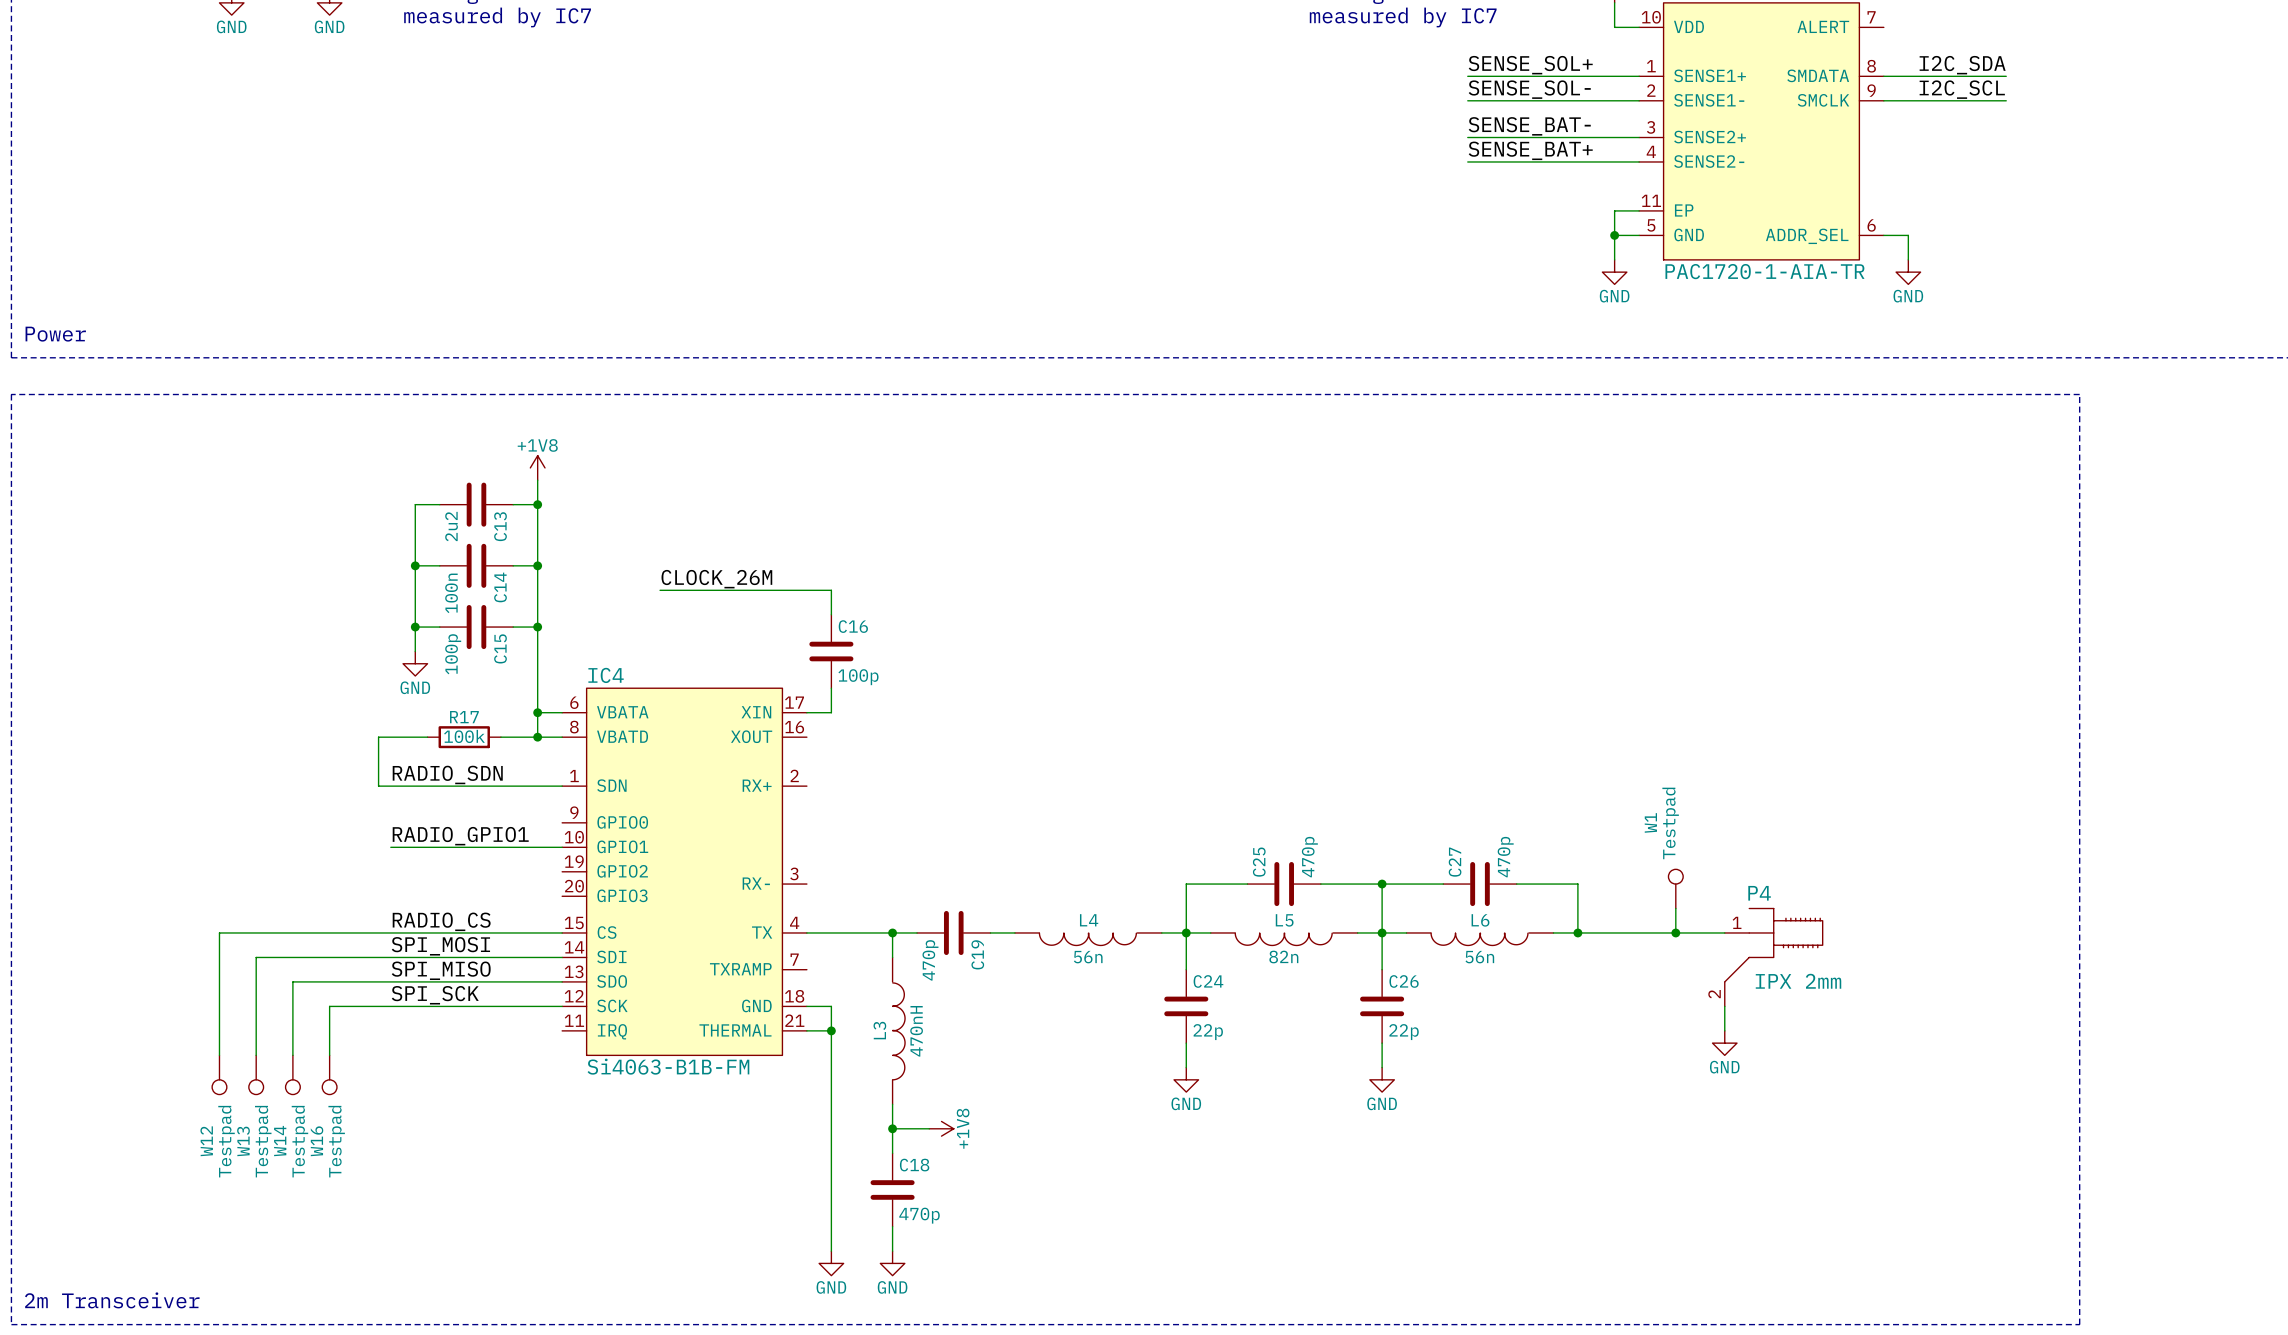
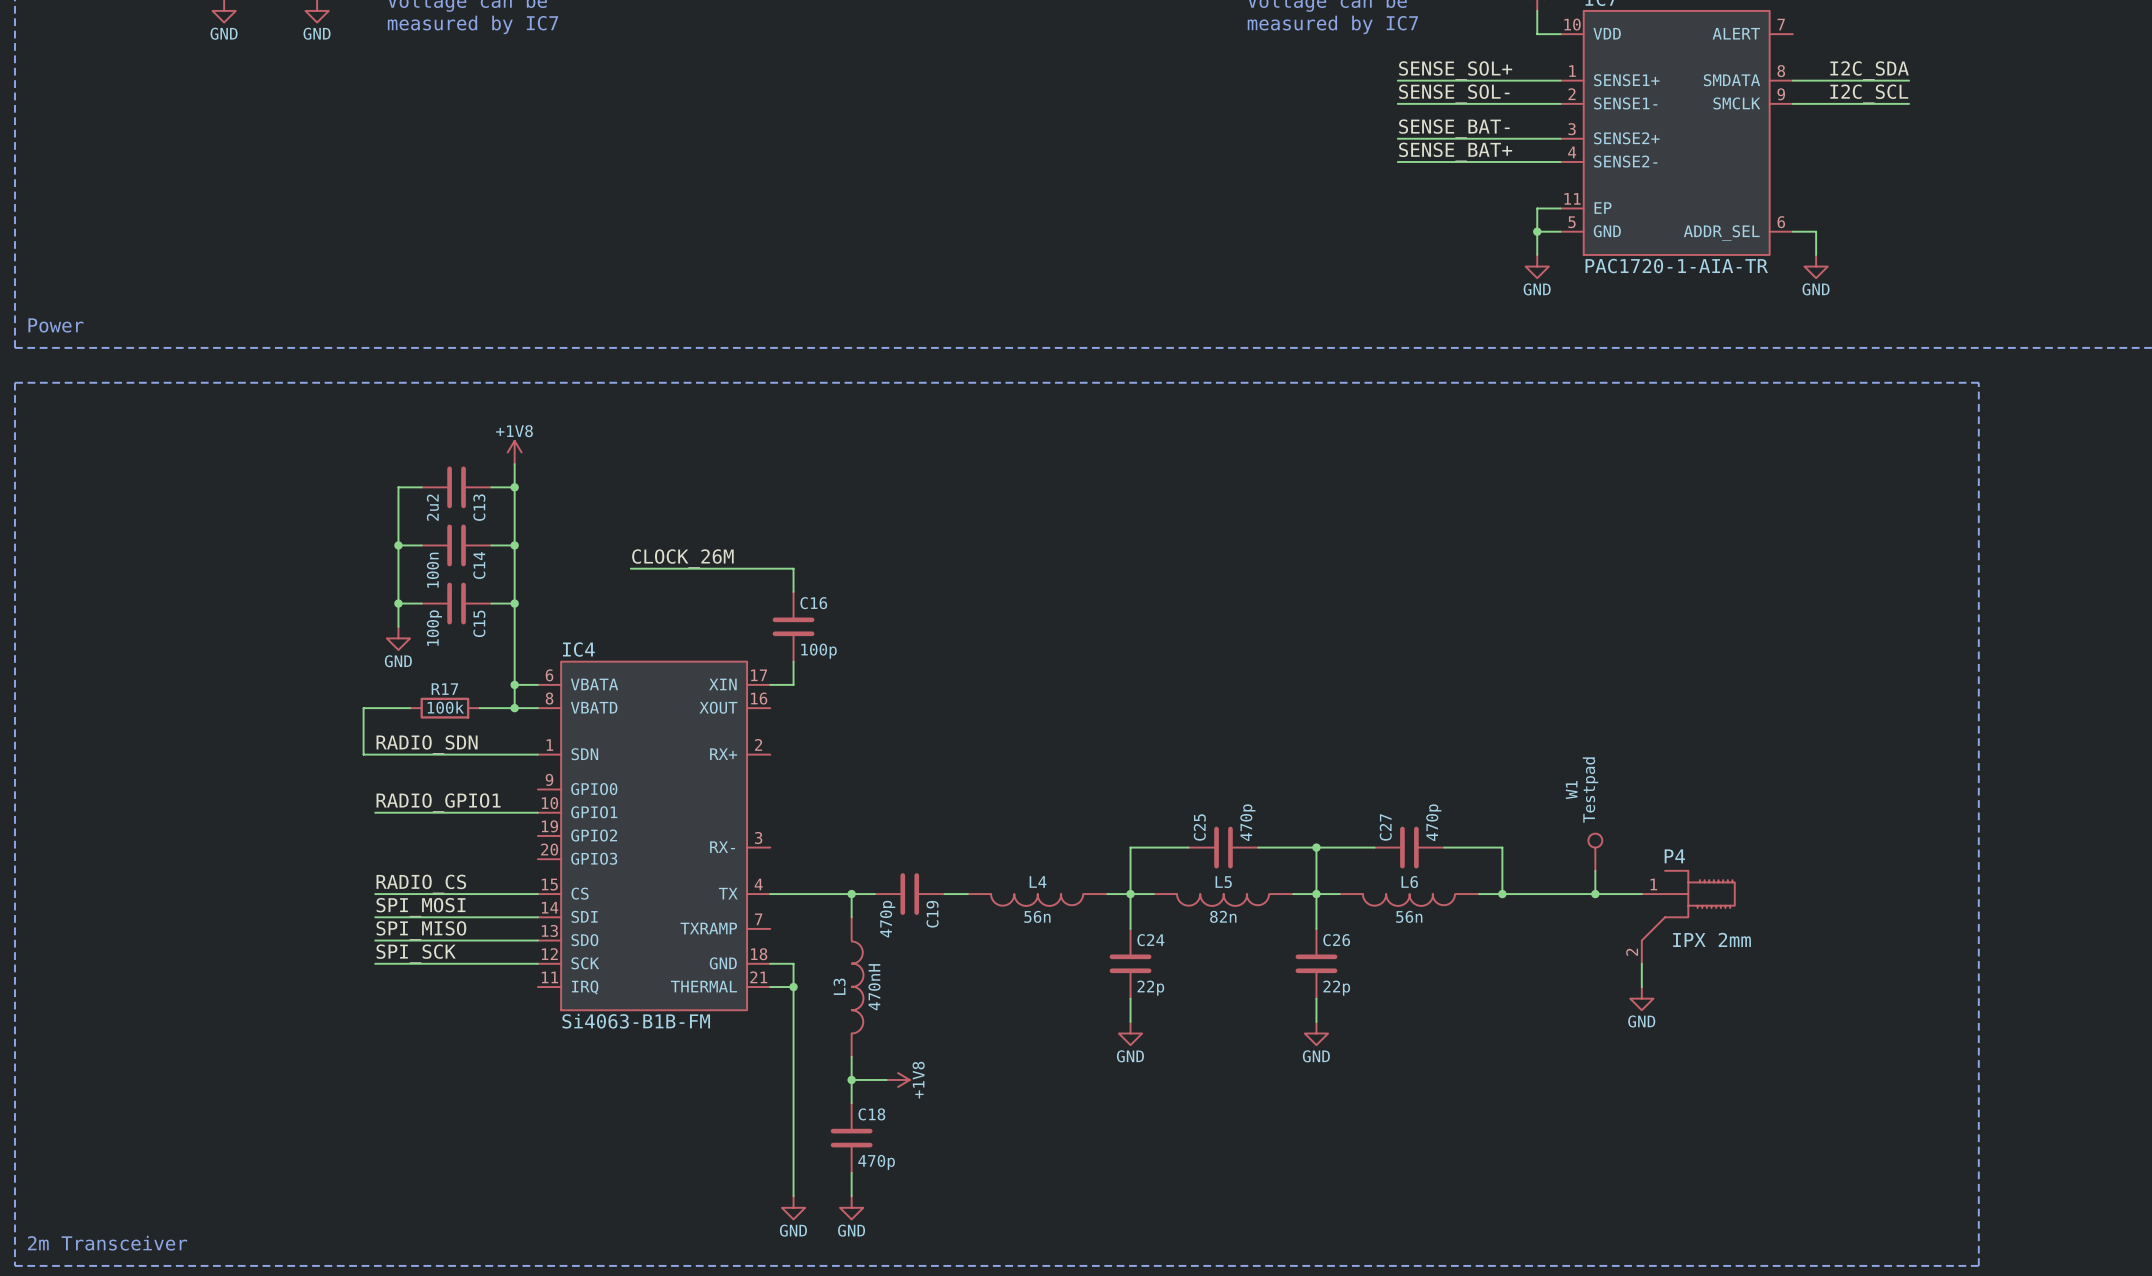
wire: (390, 932) (219, 932) (219, 1055) -> none
wire: (390, 957) (256, 957) (256, 1055) -> none
wire: (390, 981) (292, 981) (292, 1055) -> none
wire: (390, 1006) (329, 1006) (329, 1055) -> none
W12: Testpad (219, 1074) -> none
W13: Testpad (256, 1074) -> none
W14: Testpad (292, 1074) -> none
W16: Testpad (329, 1074) -> none

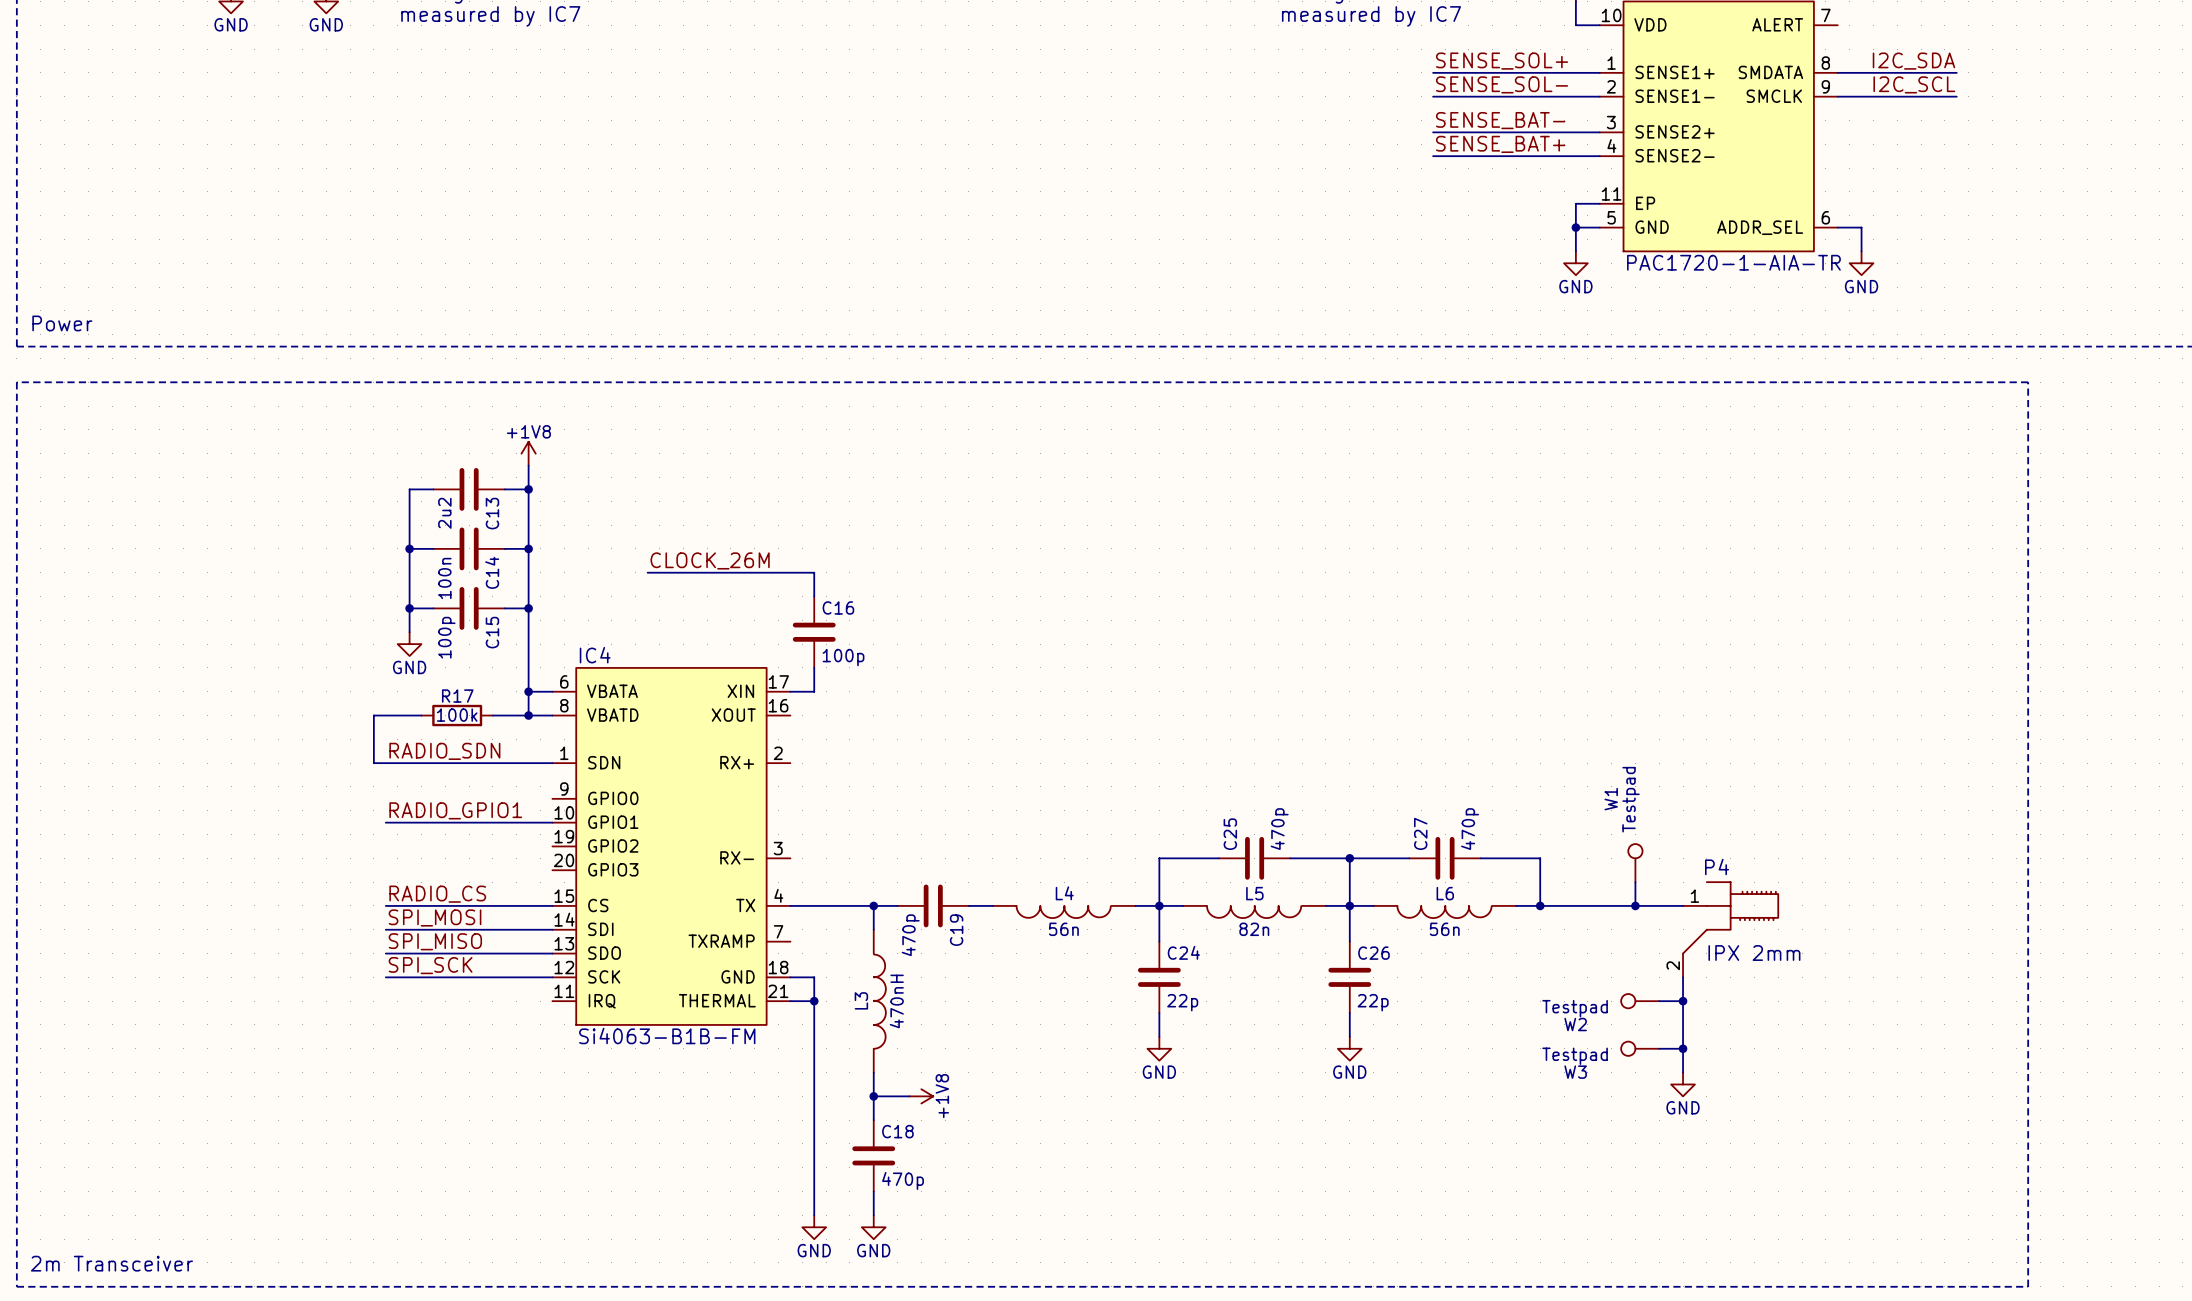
W2: none -> Testpad (1640, 1001)
wire: none -> (1659, 1001) (1683, 1001) (1683, 1072)
junction: none -> (1683, 1001)
power symbol position: GND (1641, 998) -> GND (1683, 1084)
W3: none -> Testpad (1640, 1048)
wire: none -> (1659, 1048) (1683, 1048)
junction: none -> (1683, 1048)

